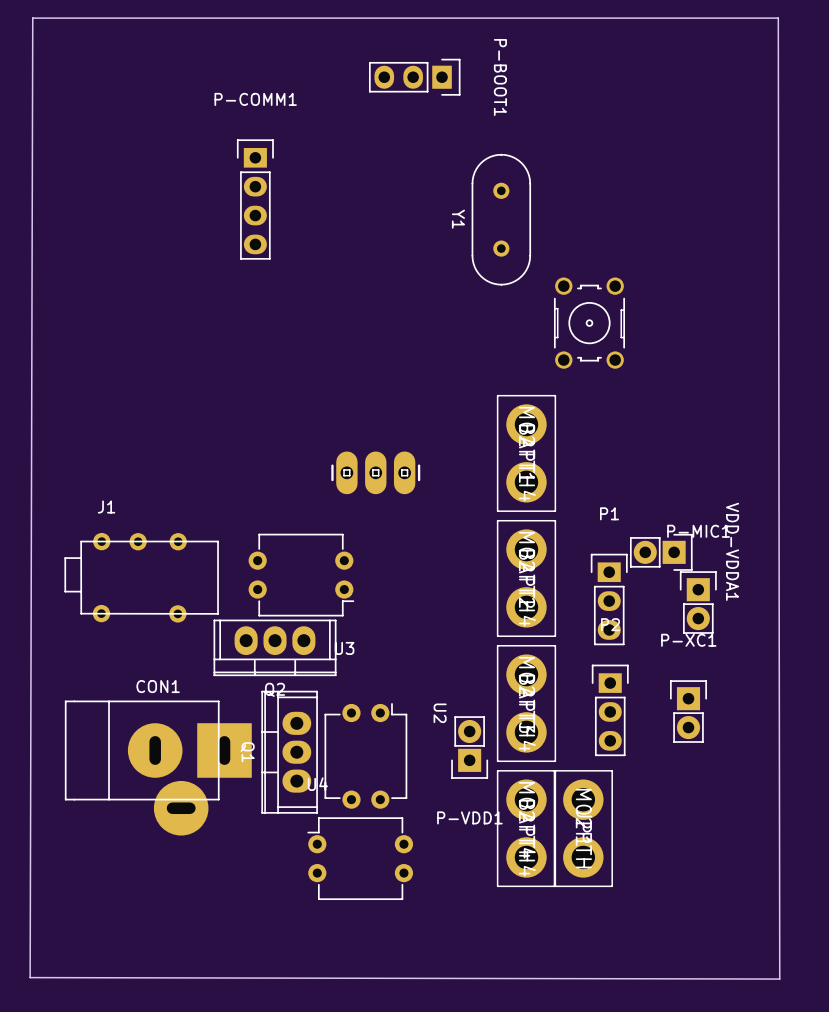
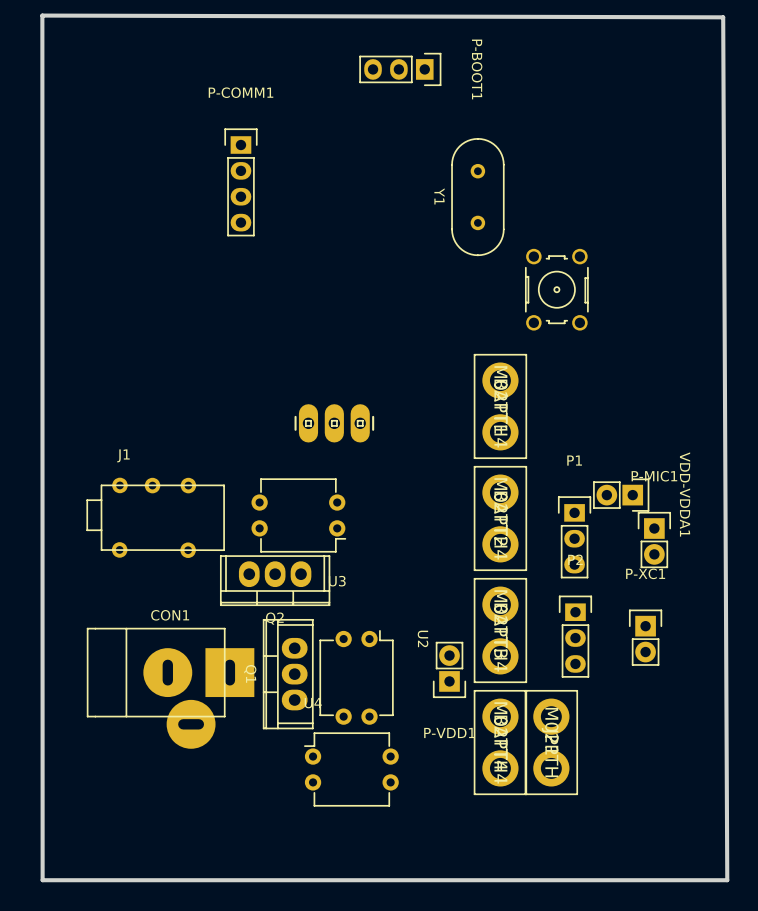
board edge: (778, 18) (779, 979) (30, 977) (32, 18) (778, 18) -> (42, 15) (723, 17) (727, 880) (42, 880) (42, 15)
P-COMM1 position: (255, 199) -> (240, 182)
part position: (375, 472) -> (334, 423)

